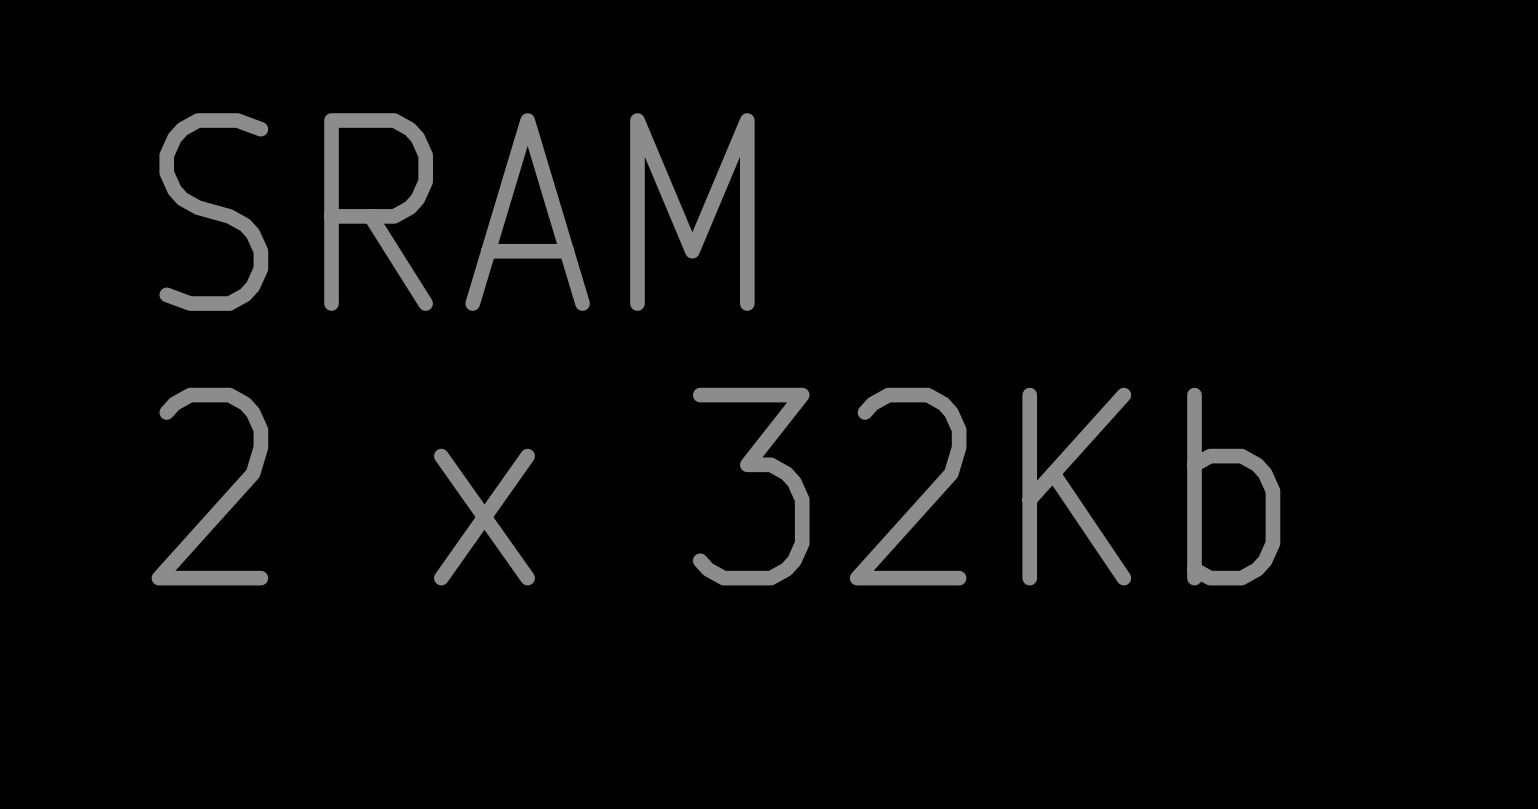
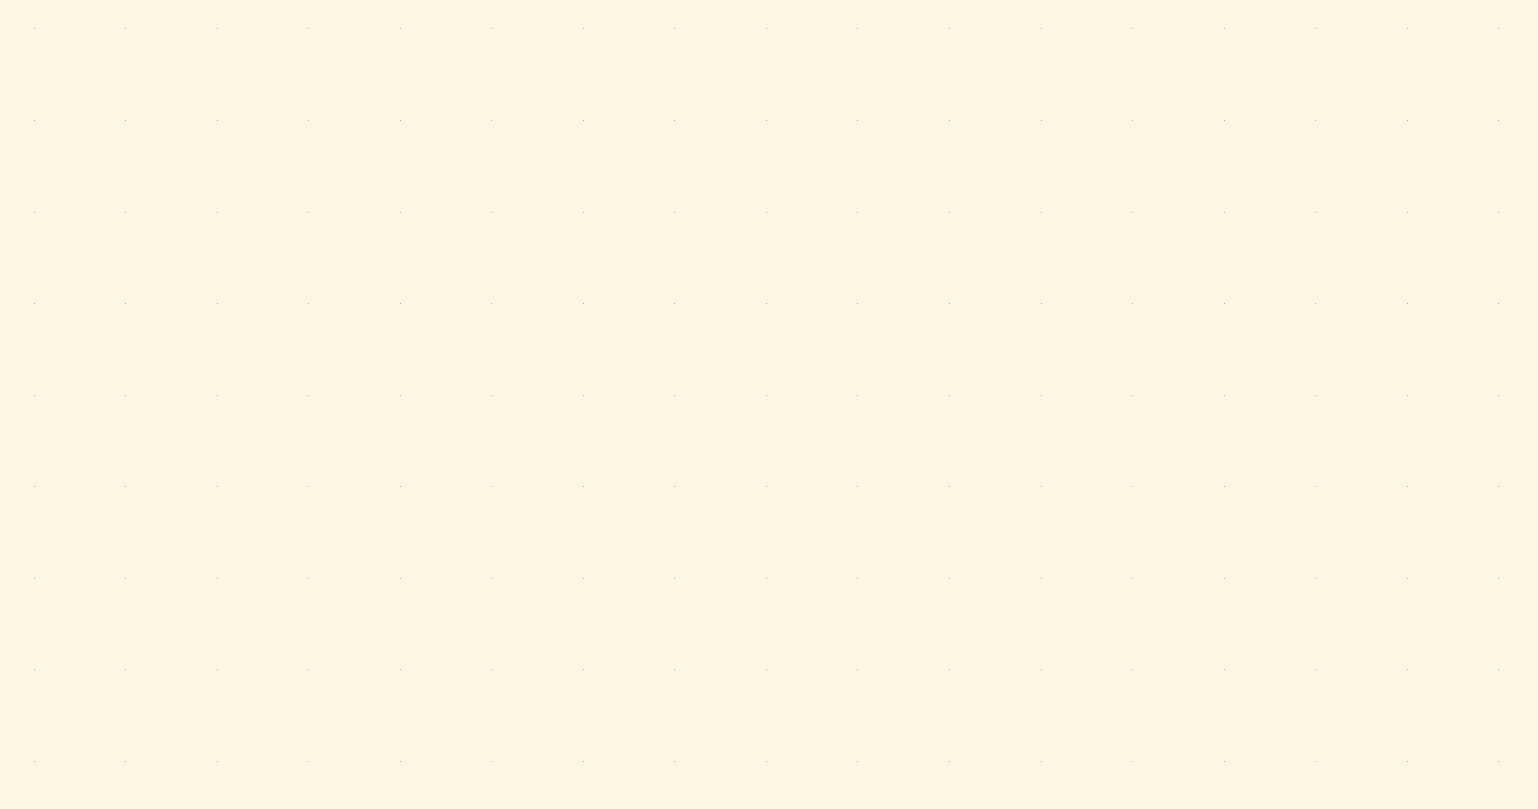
text: SRAM (457, 212) -> none
text: 2 x 32Kb (715, 486) -> none

